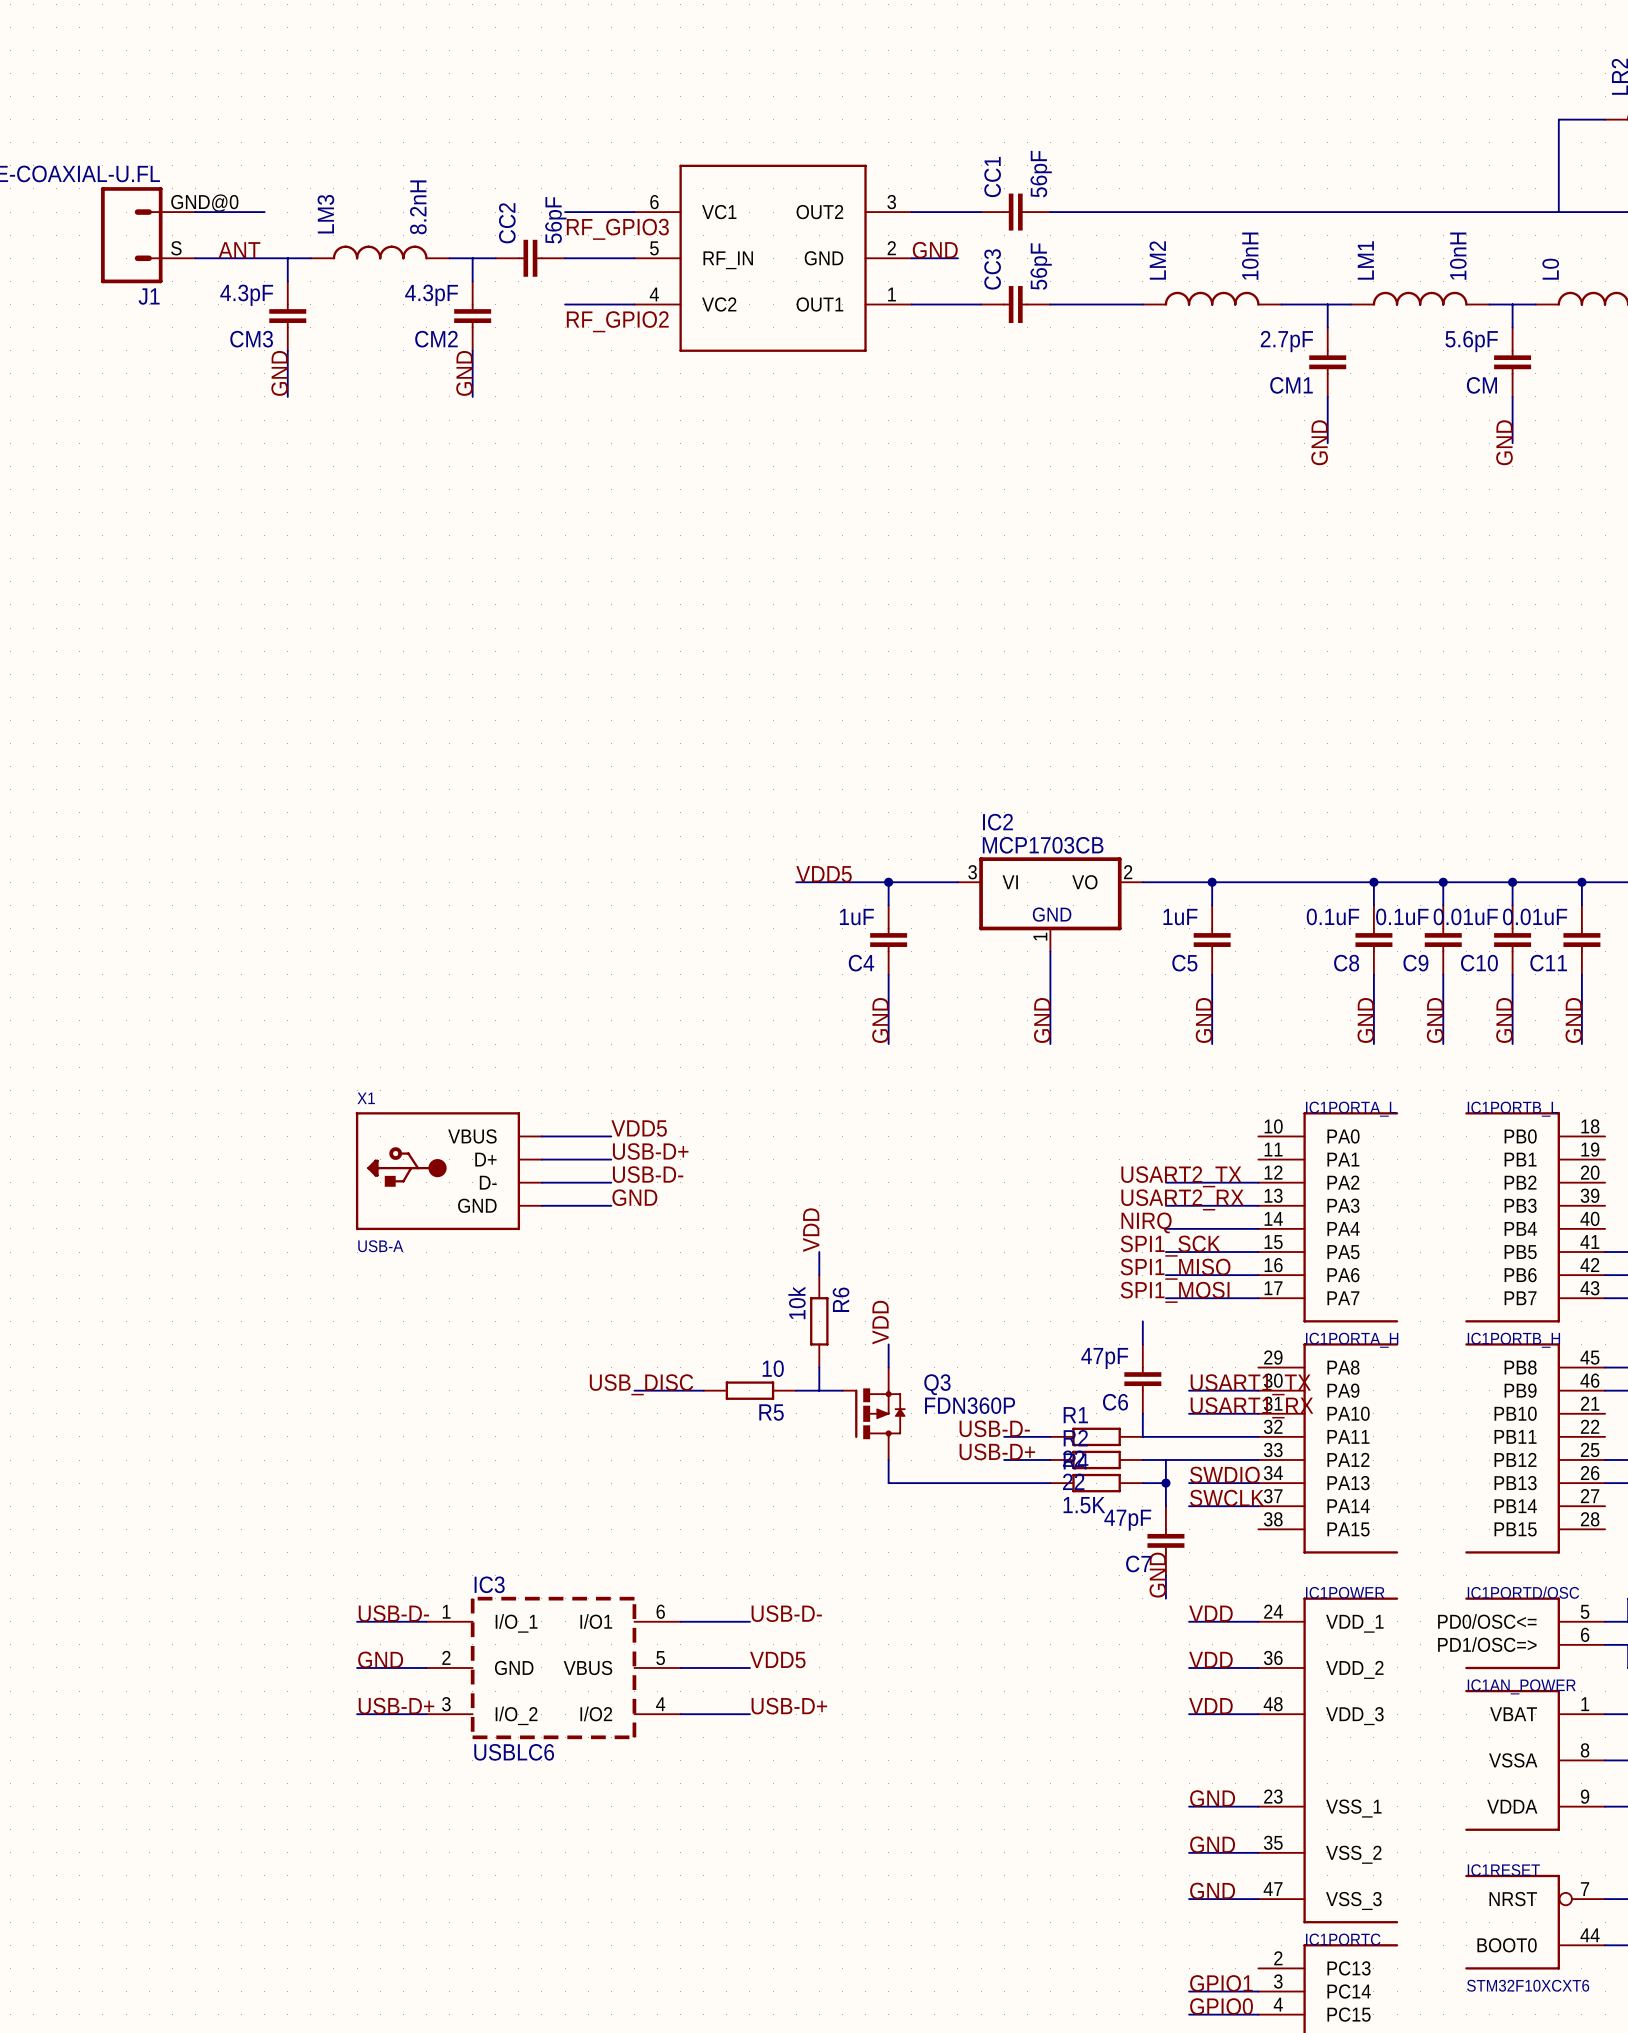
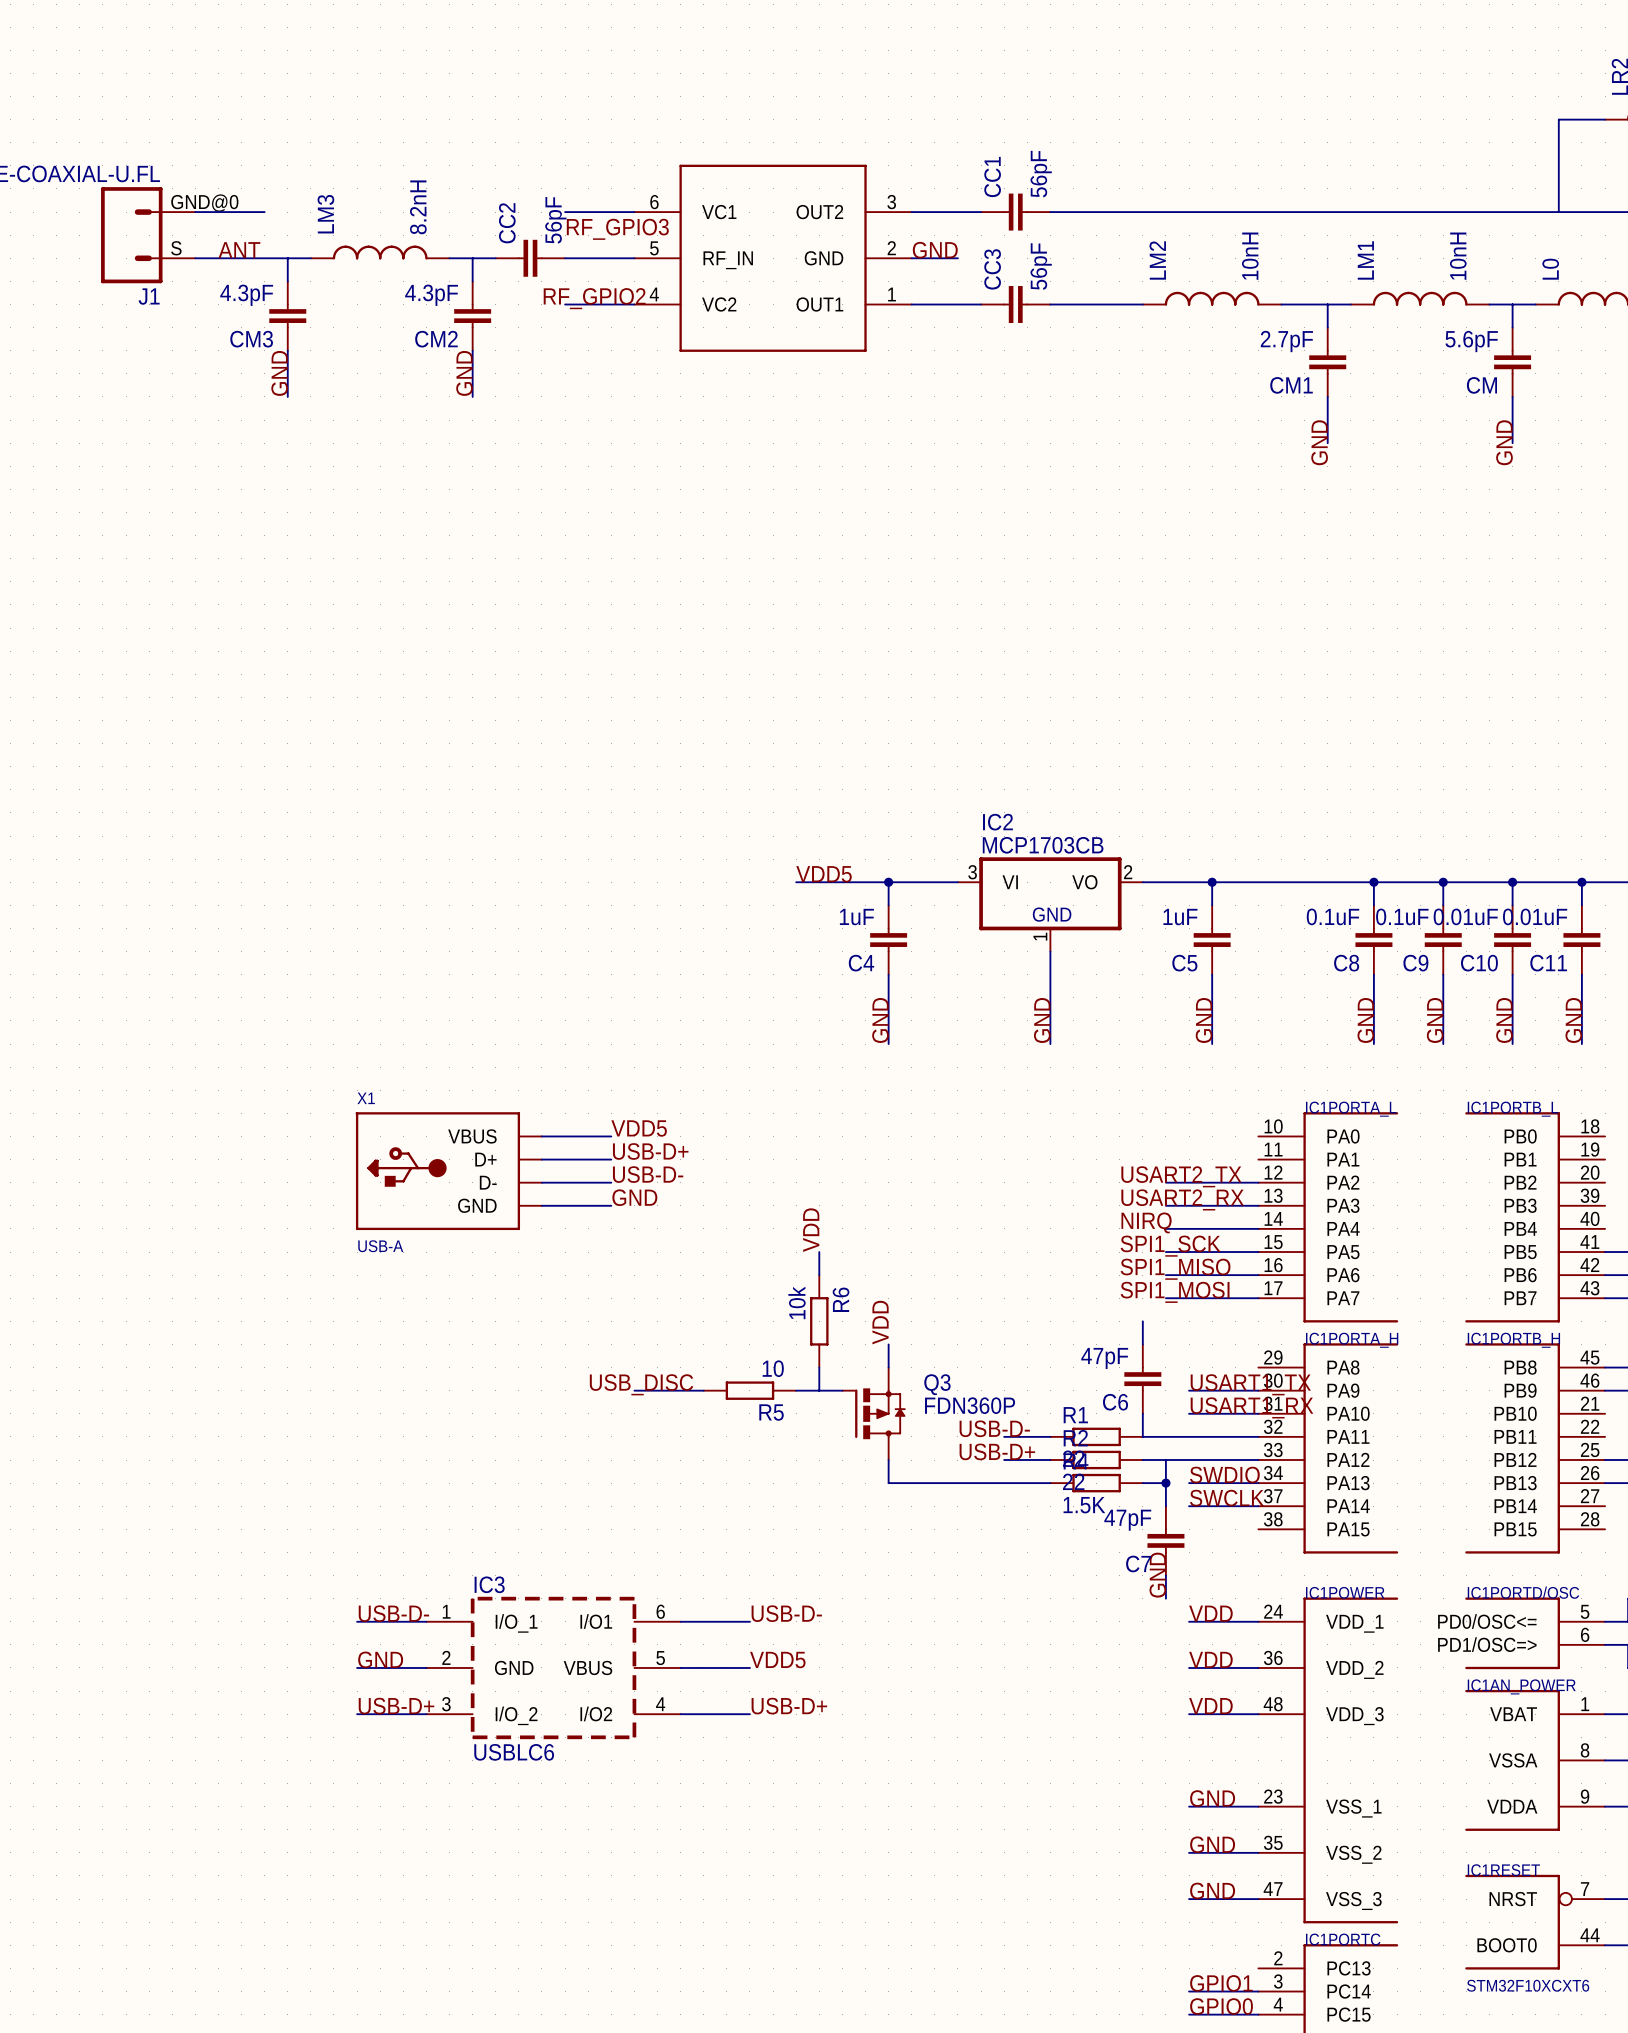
label position: RF_GPIO2 (617, 321) -> RF_GPIO2 (594, 298)

